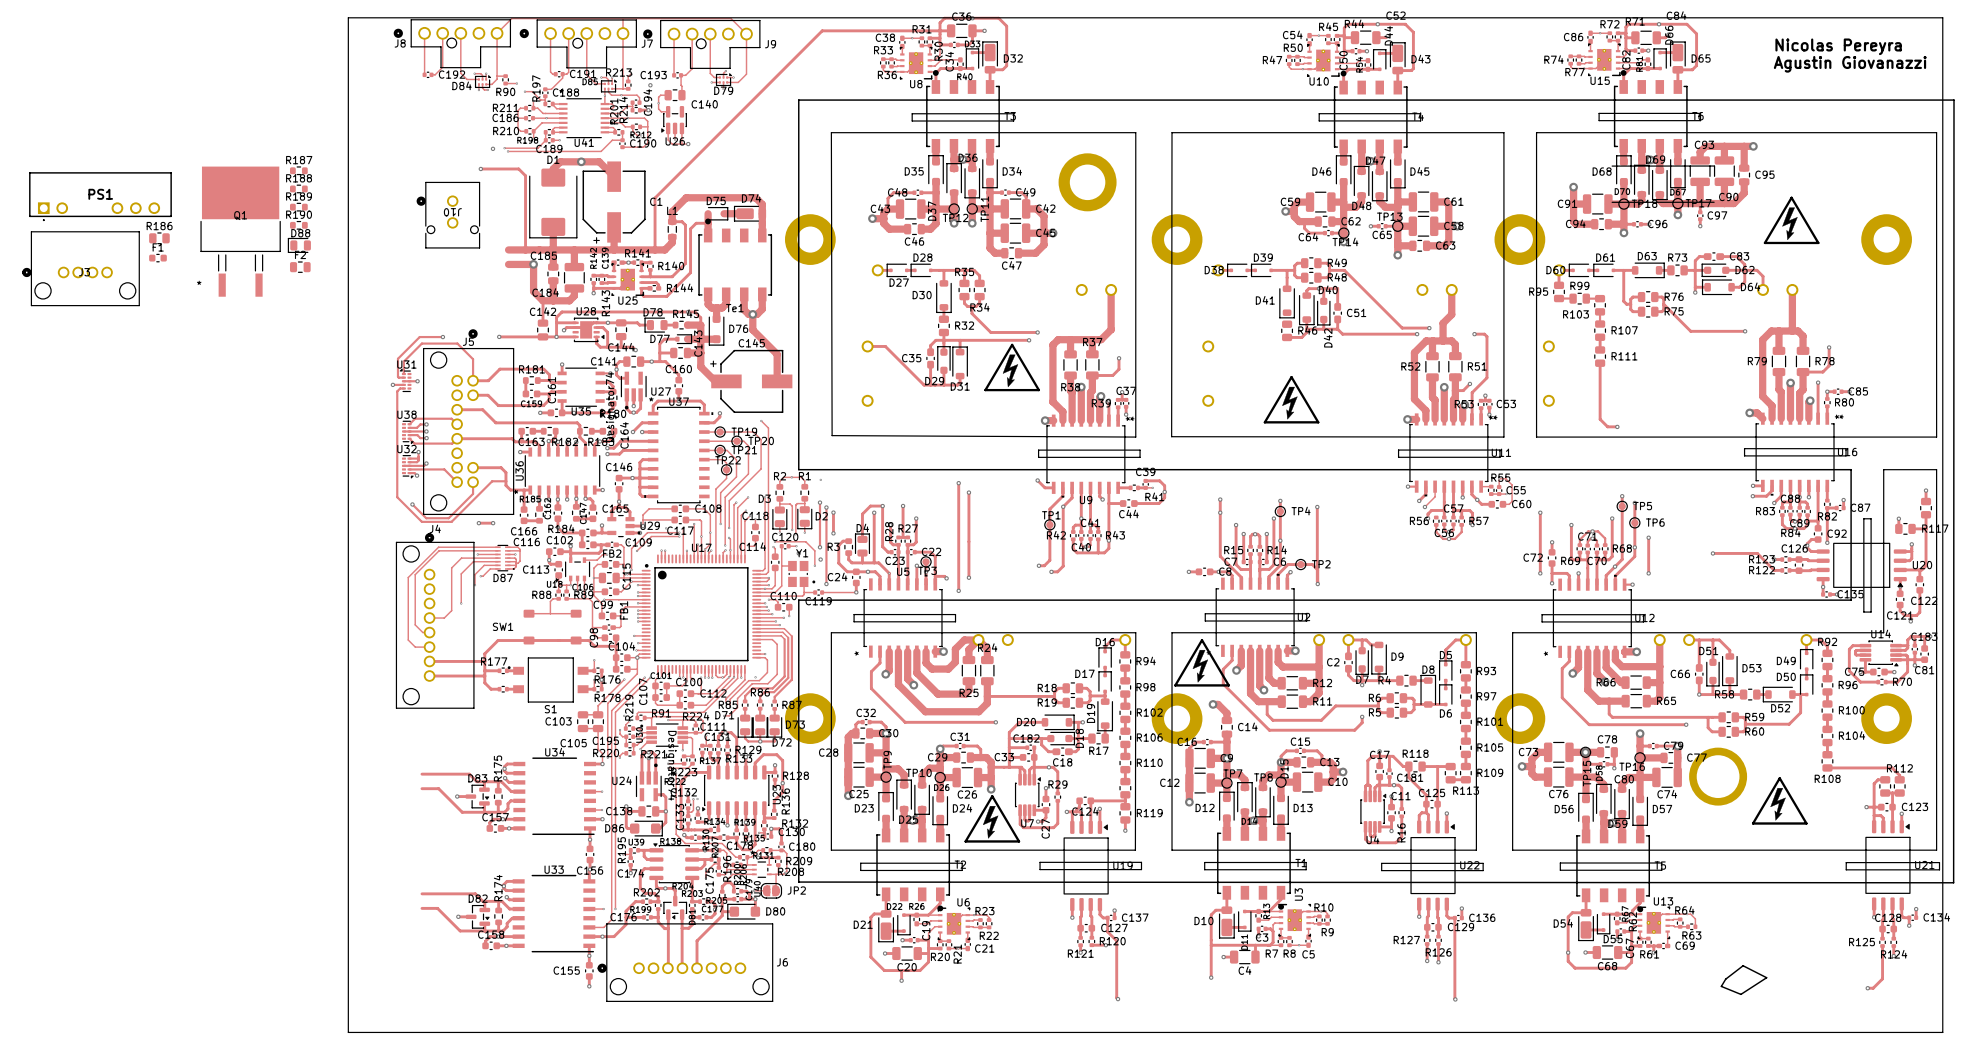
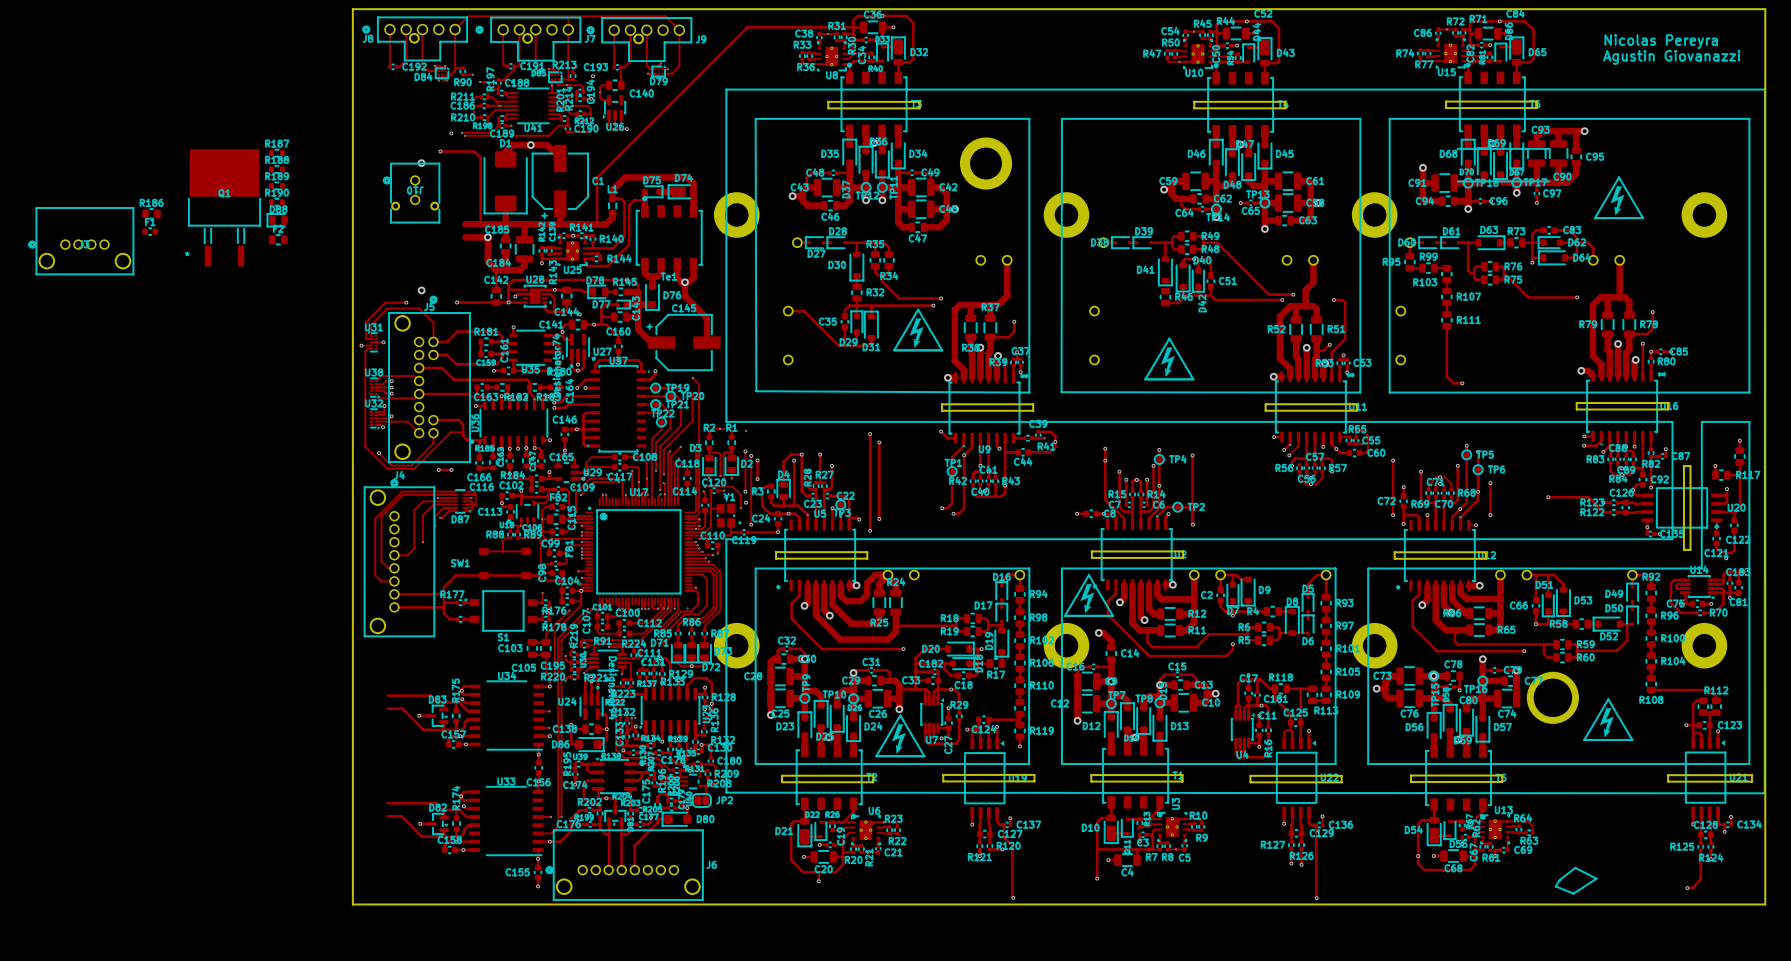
board edge: (348, 17) (1942, 17) (1942, 1032) (348, 1032) (348, 17) -> (352, 9) (352, 904) (1765, 904) (1765, 9) (352, 9)
via: none -> (421, 163)
PS1: (100, 196) -> none
via: none -> (421, 290)

